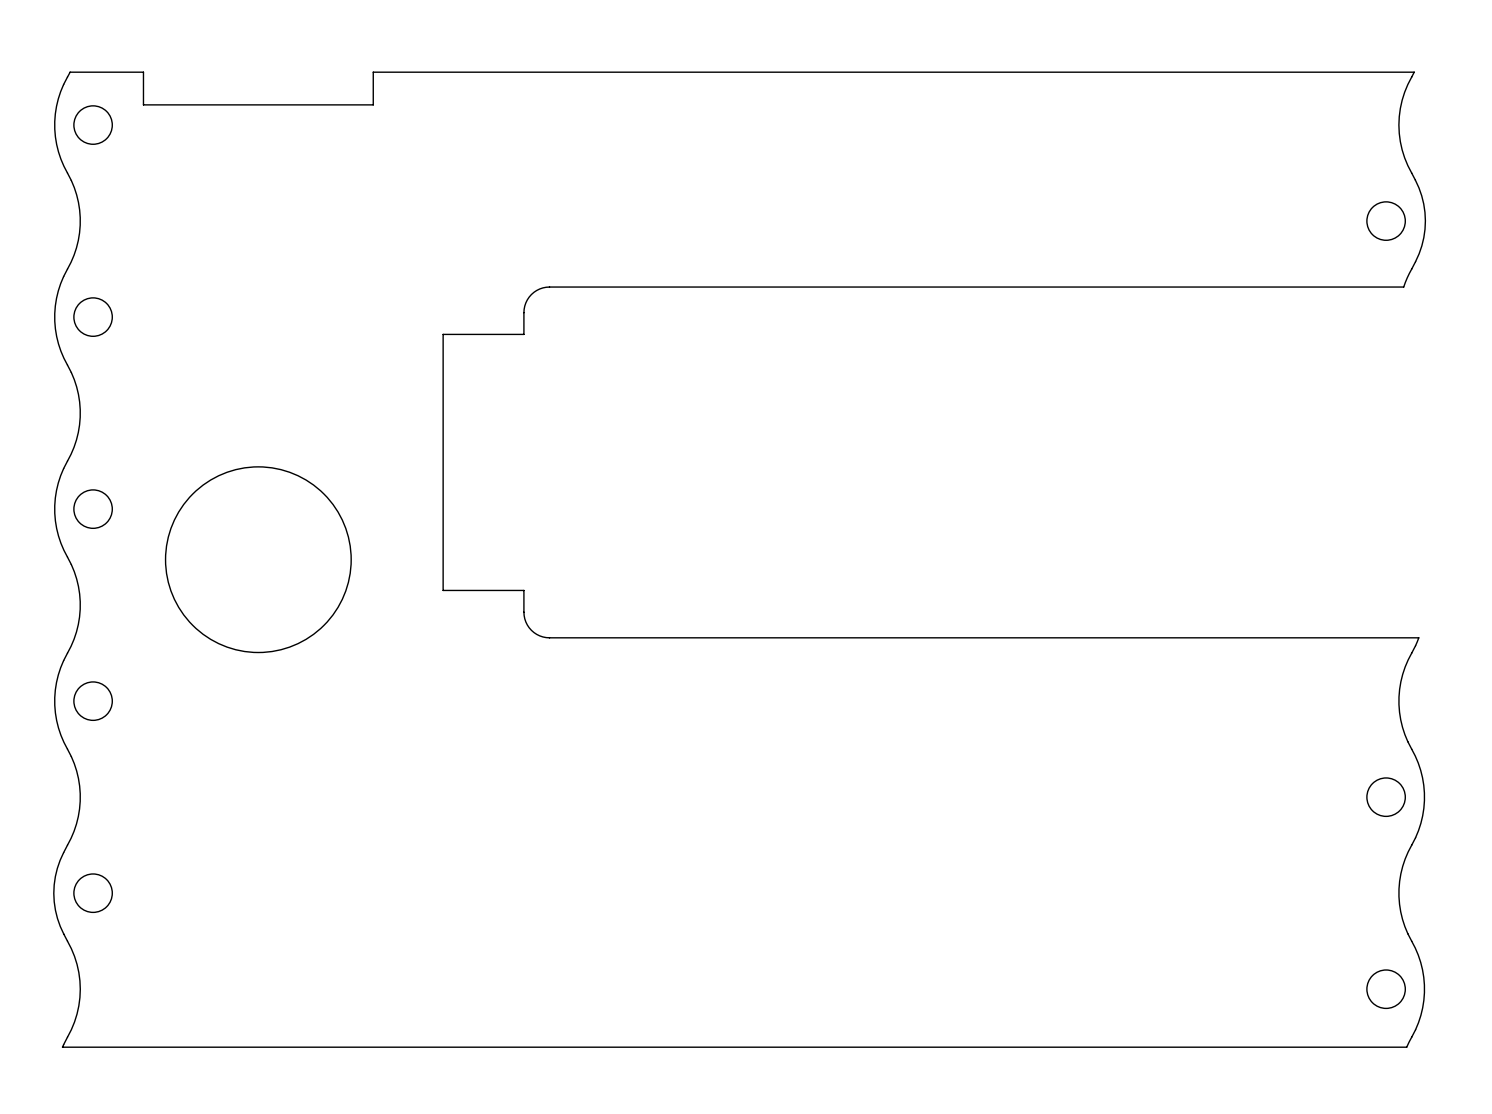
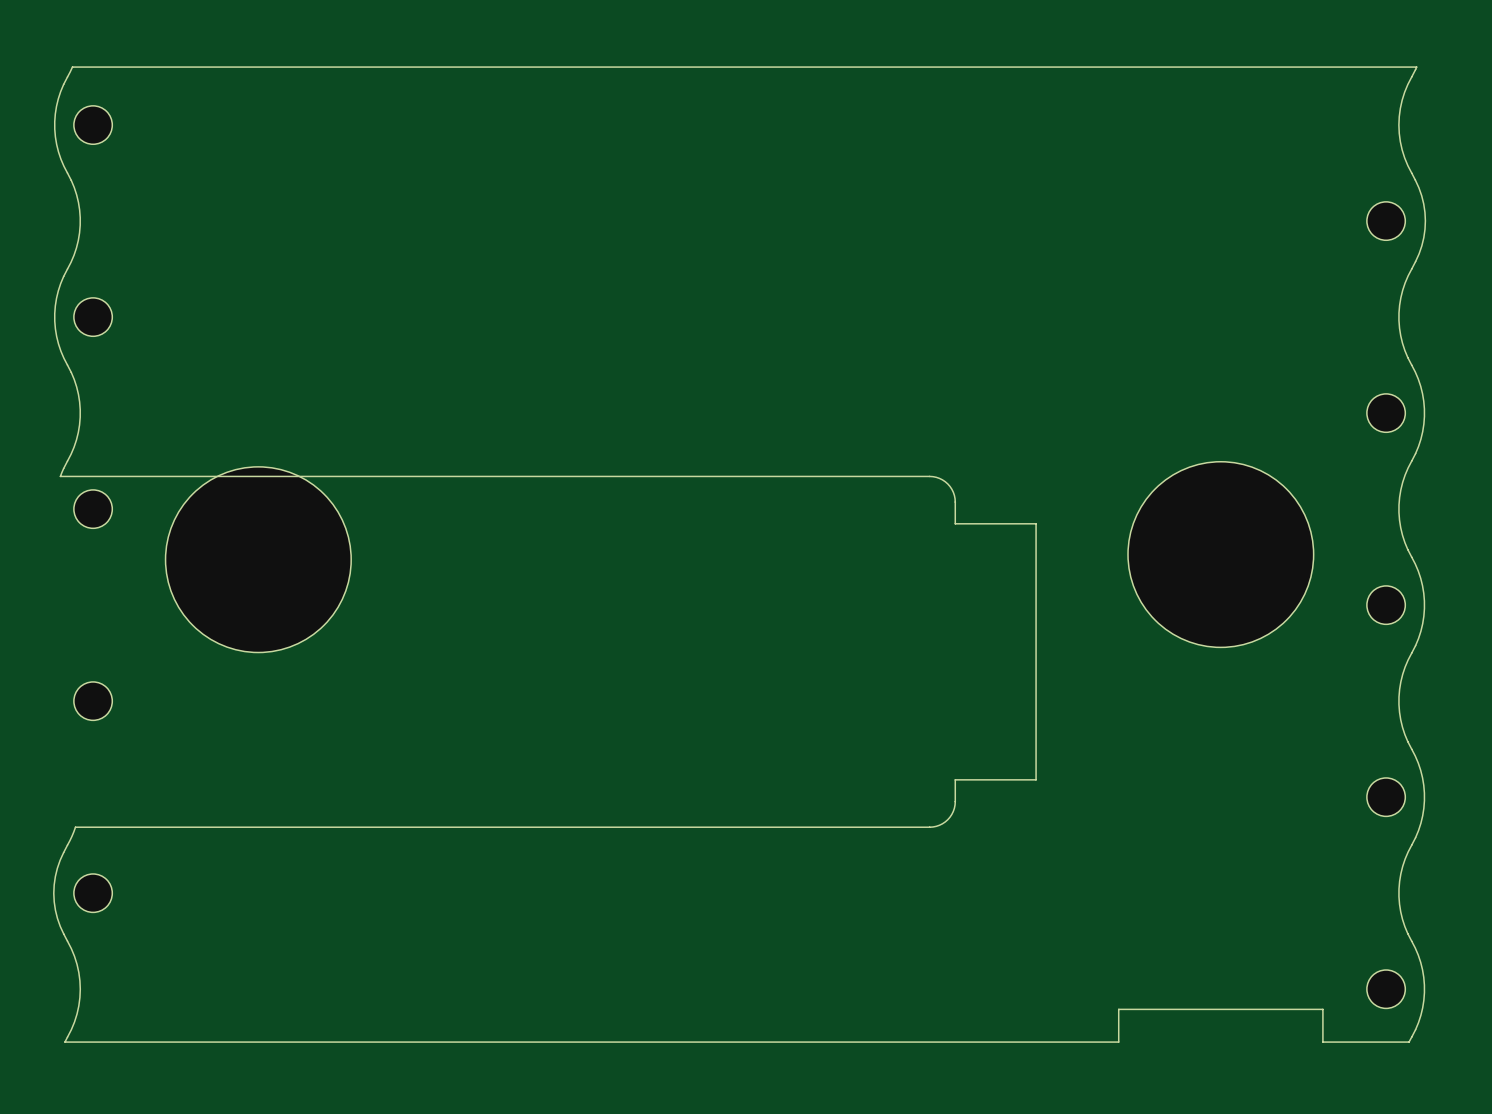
board edge: (1414, 72) (373, 72) (373, 104) (143, 104) (143, 72) (70, 72) (67, 77) -> (1414, 72) (1416, 67) (72, 67) (67, 77)
board edge: (1411, 269) (1403, 287) (542, 287) (531, 294) (525, 302) (523, 334) (443, 334) (443, 590) (523, 590) (524, 615) (527, 625) (536, 634) (549, 637) (1418, 637) (1415, 645) -> (1411, 269) (1400, 297) (1399, 328) (1404, 350) (1420, 386) (1424, 416) (1418, 446) (1402, 482) (1398, 512) (1402, 535) (1418, 570) (1423, 593) (1423, 616) (1415, 645)
hole: none -> (1386, 413)
board edge: (63, 468) (55, 498) (55, 520) (60, 543) (76, 578) (80, 601) (76, 632) (60, 667) (54, 697) (58, 728) (74, 763) (79, 786) (78, 816) (67, 845) -> (63, 468) (60, 476) (929, 476) (942, 479) (951, 489) (955, 498) (955, 523) (1036, 523) (1036, 779) (955, 779) (953, 811) (947, 819) (936, 826) (75, 827) (67, 845)
hole: none -> (1220, 554)
hole: none -> (1386, 605)
board edge: (1411, 1037) (1406, 1047) (62, 1047) (64, 1042) -> (1411, 1037) (1409, 1042) (1322, 1042) (1322, 1009) (1118, 1009) (1118, 1042) (64, 1042)

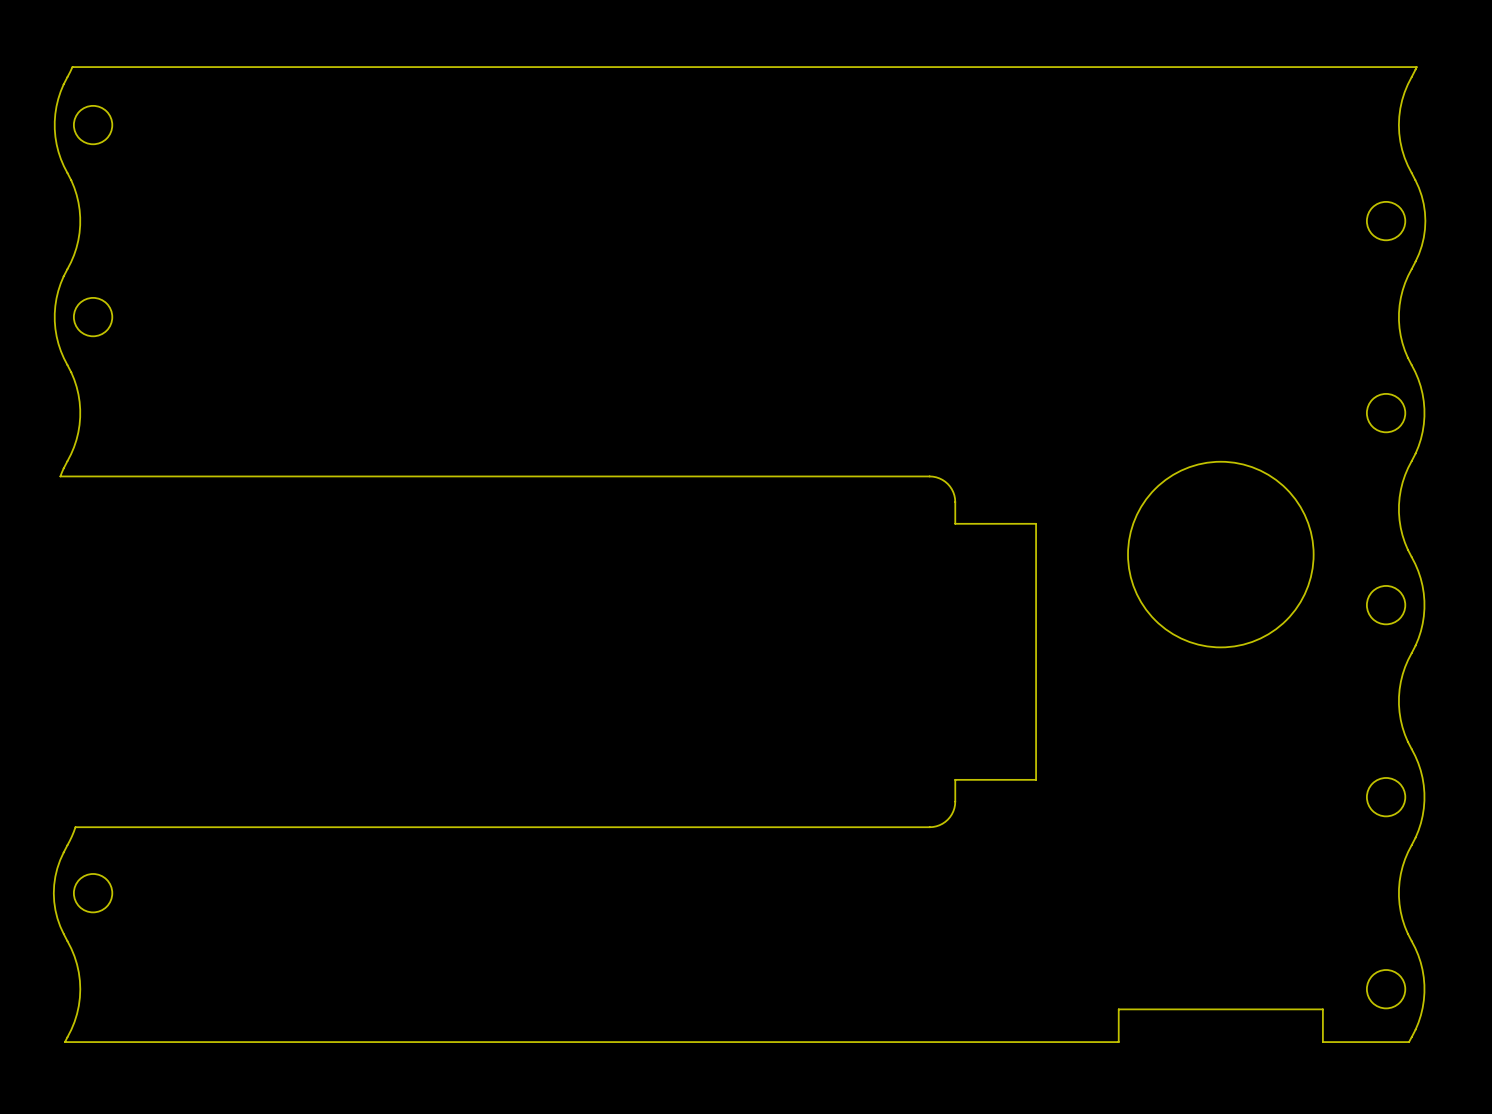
hole: (93, 509) -> none
hole: (258, 559) -> none
hole: (93, 701) -> none

